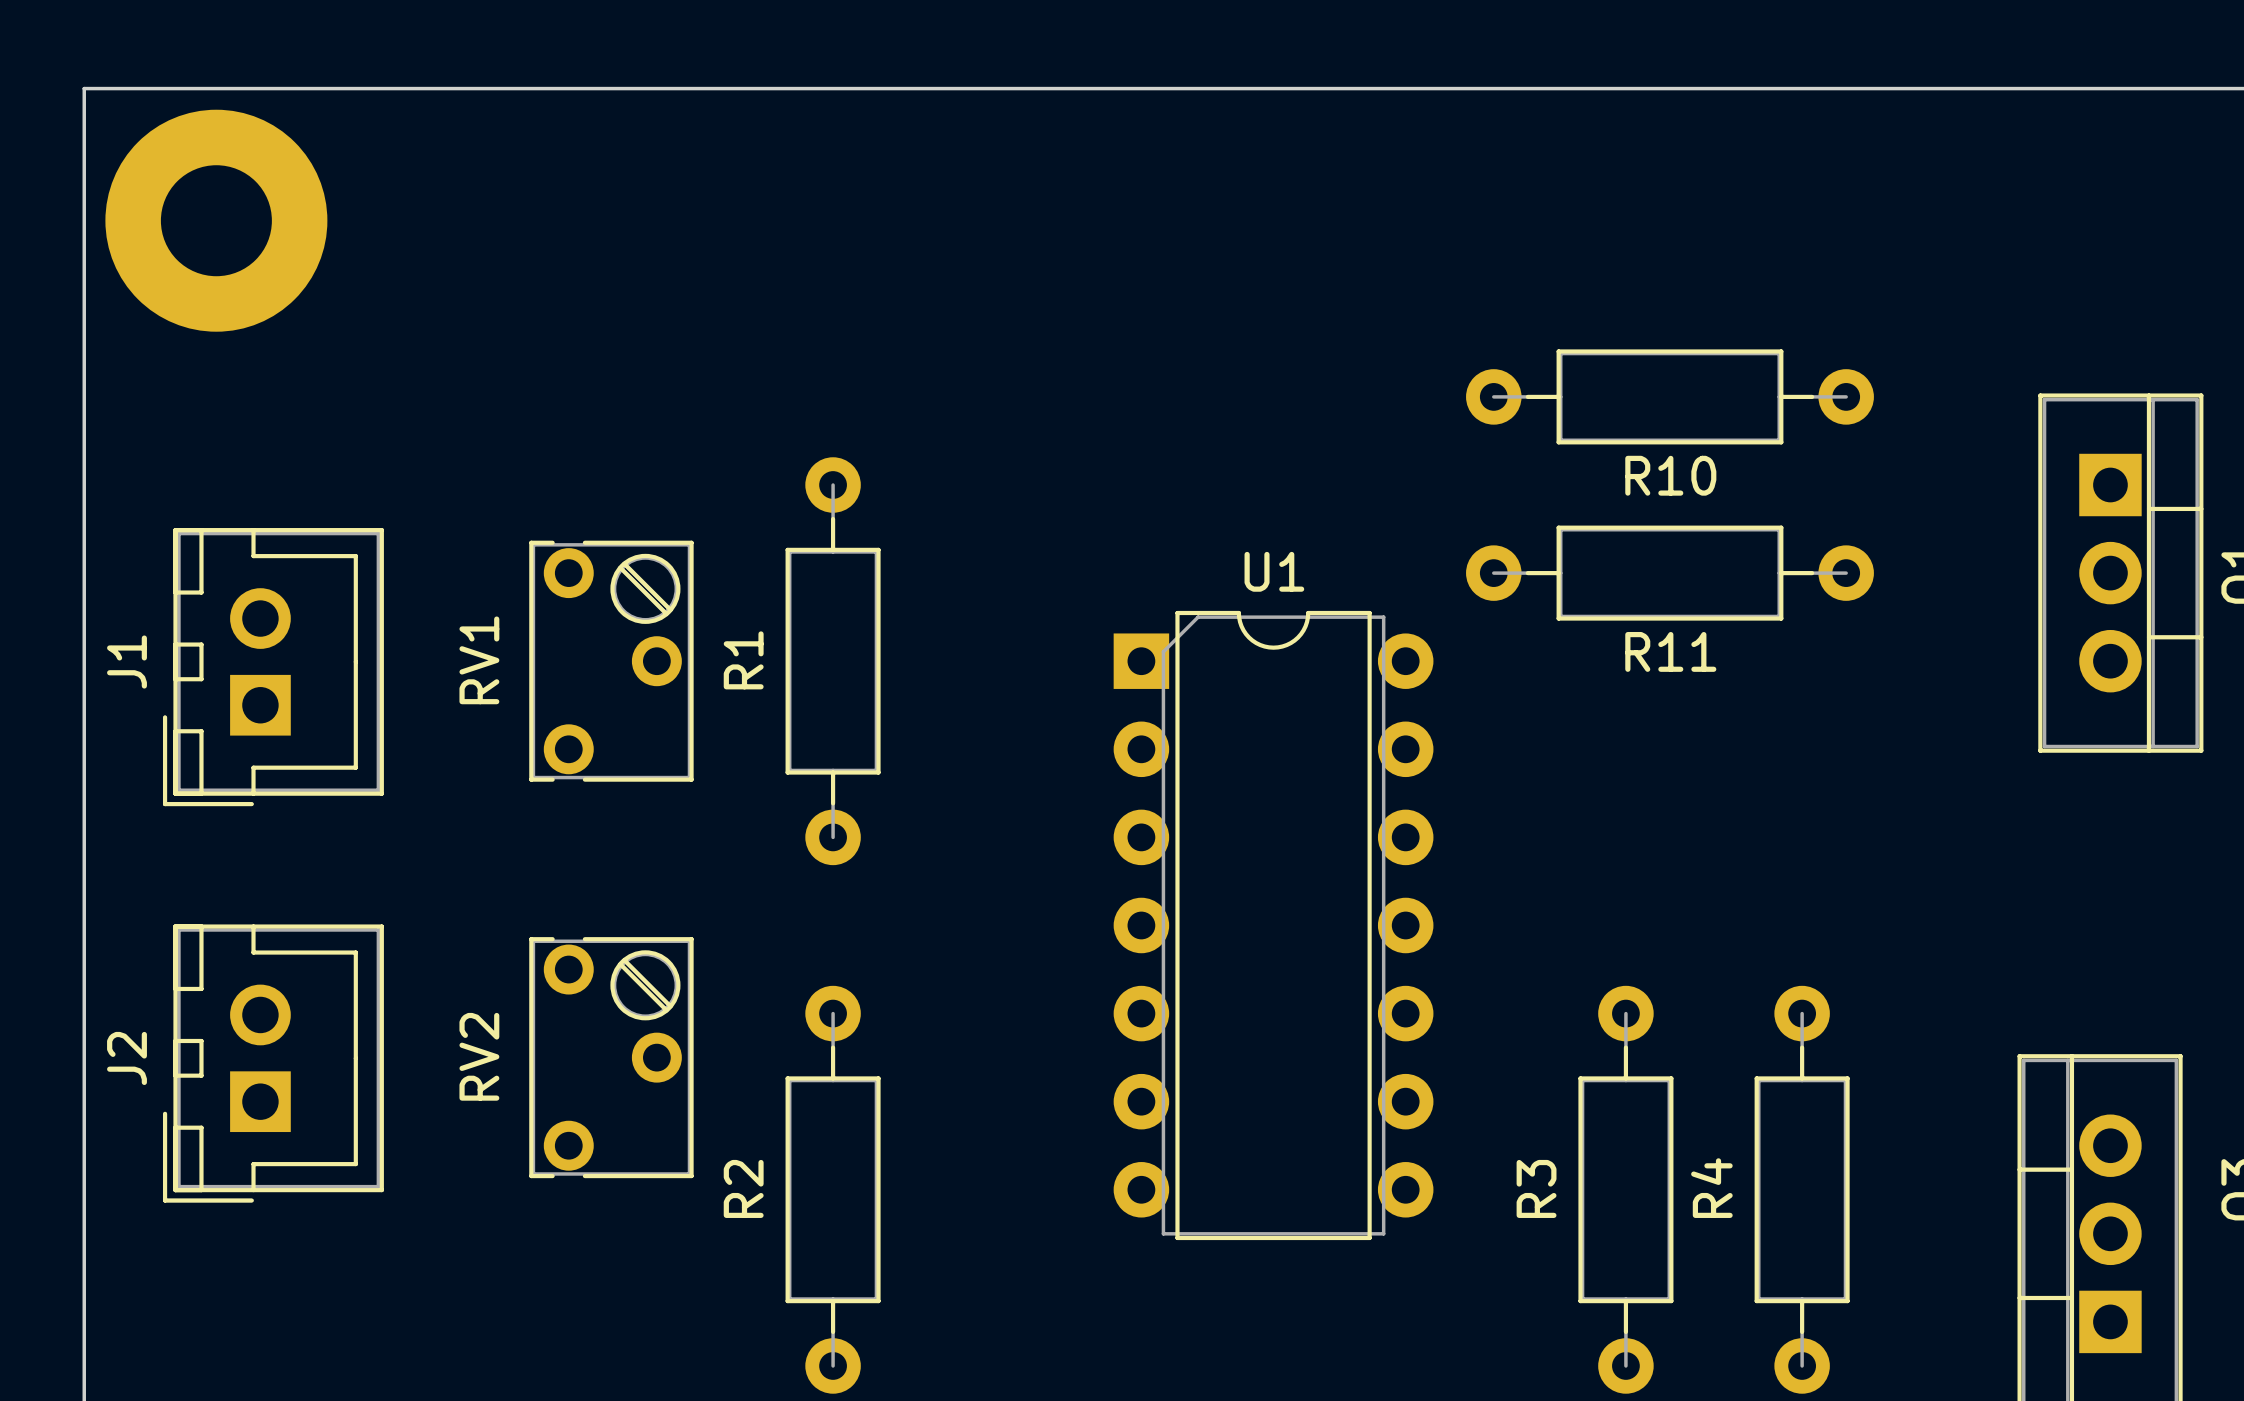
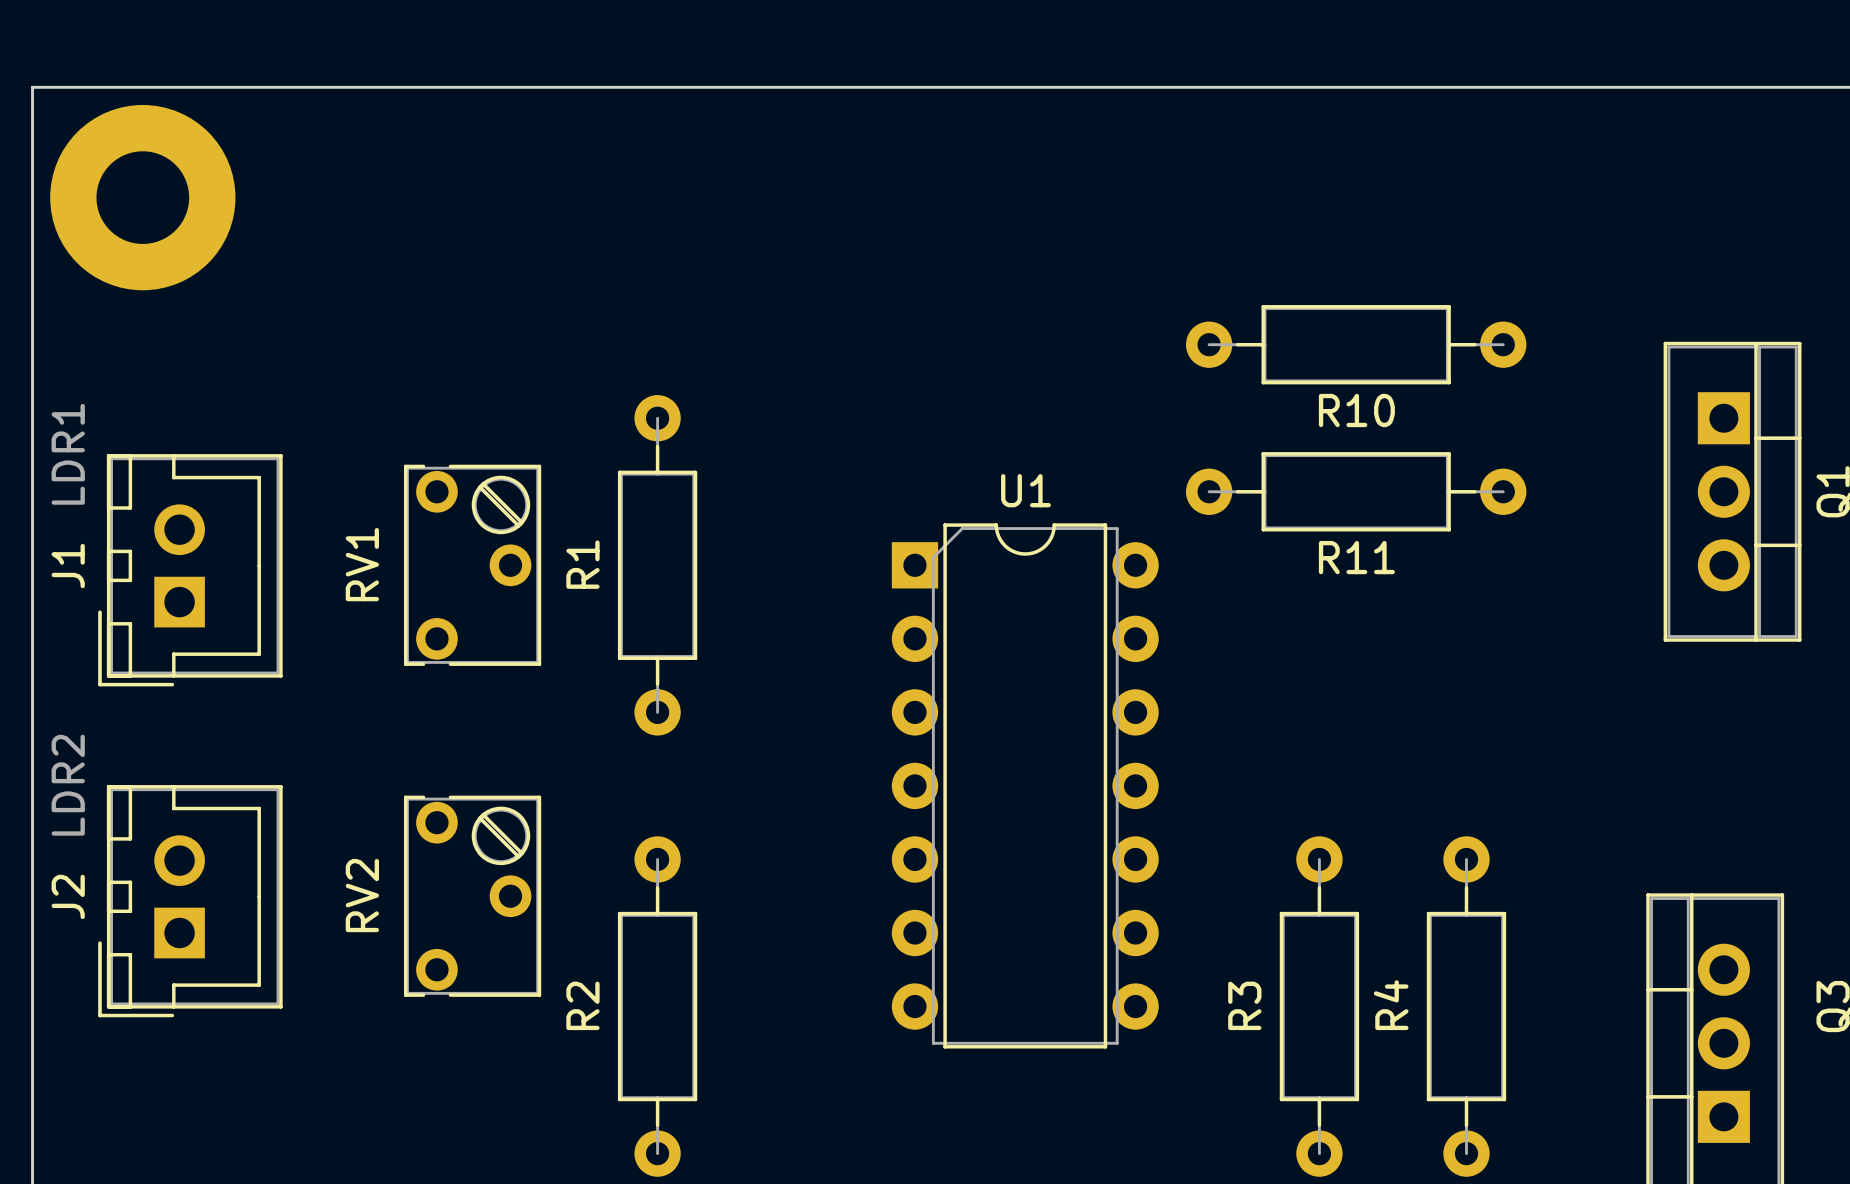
J1 value: none -> LDR1 (68, 454)
J2 value: none -> LDR2 (68, 785)

